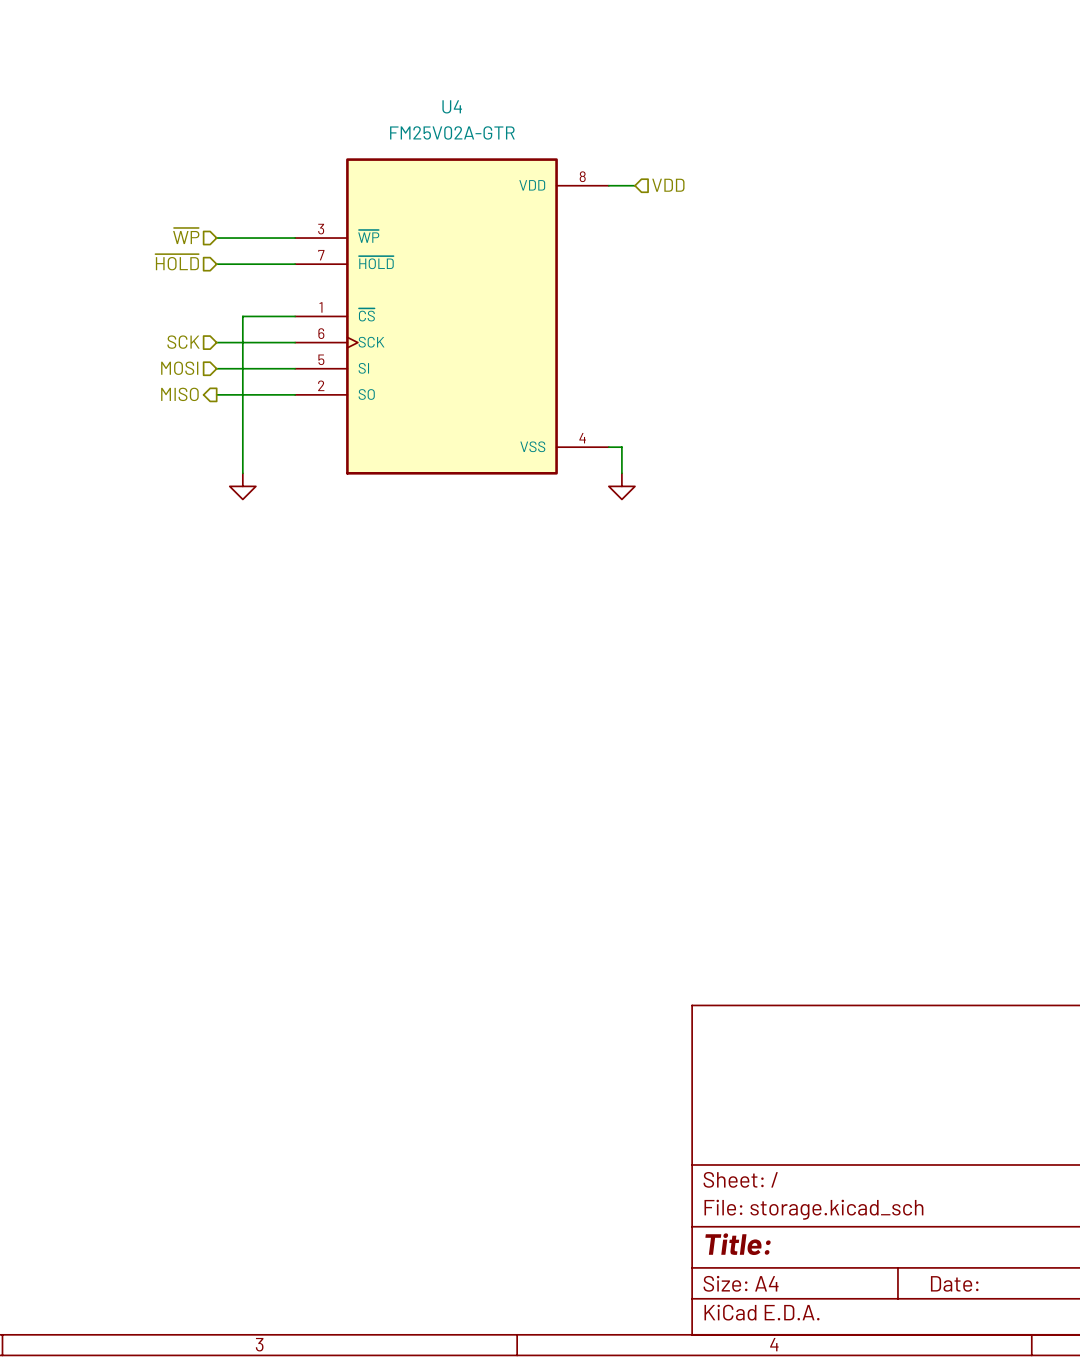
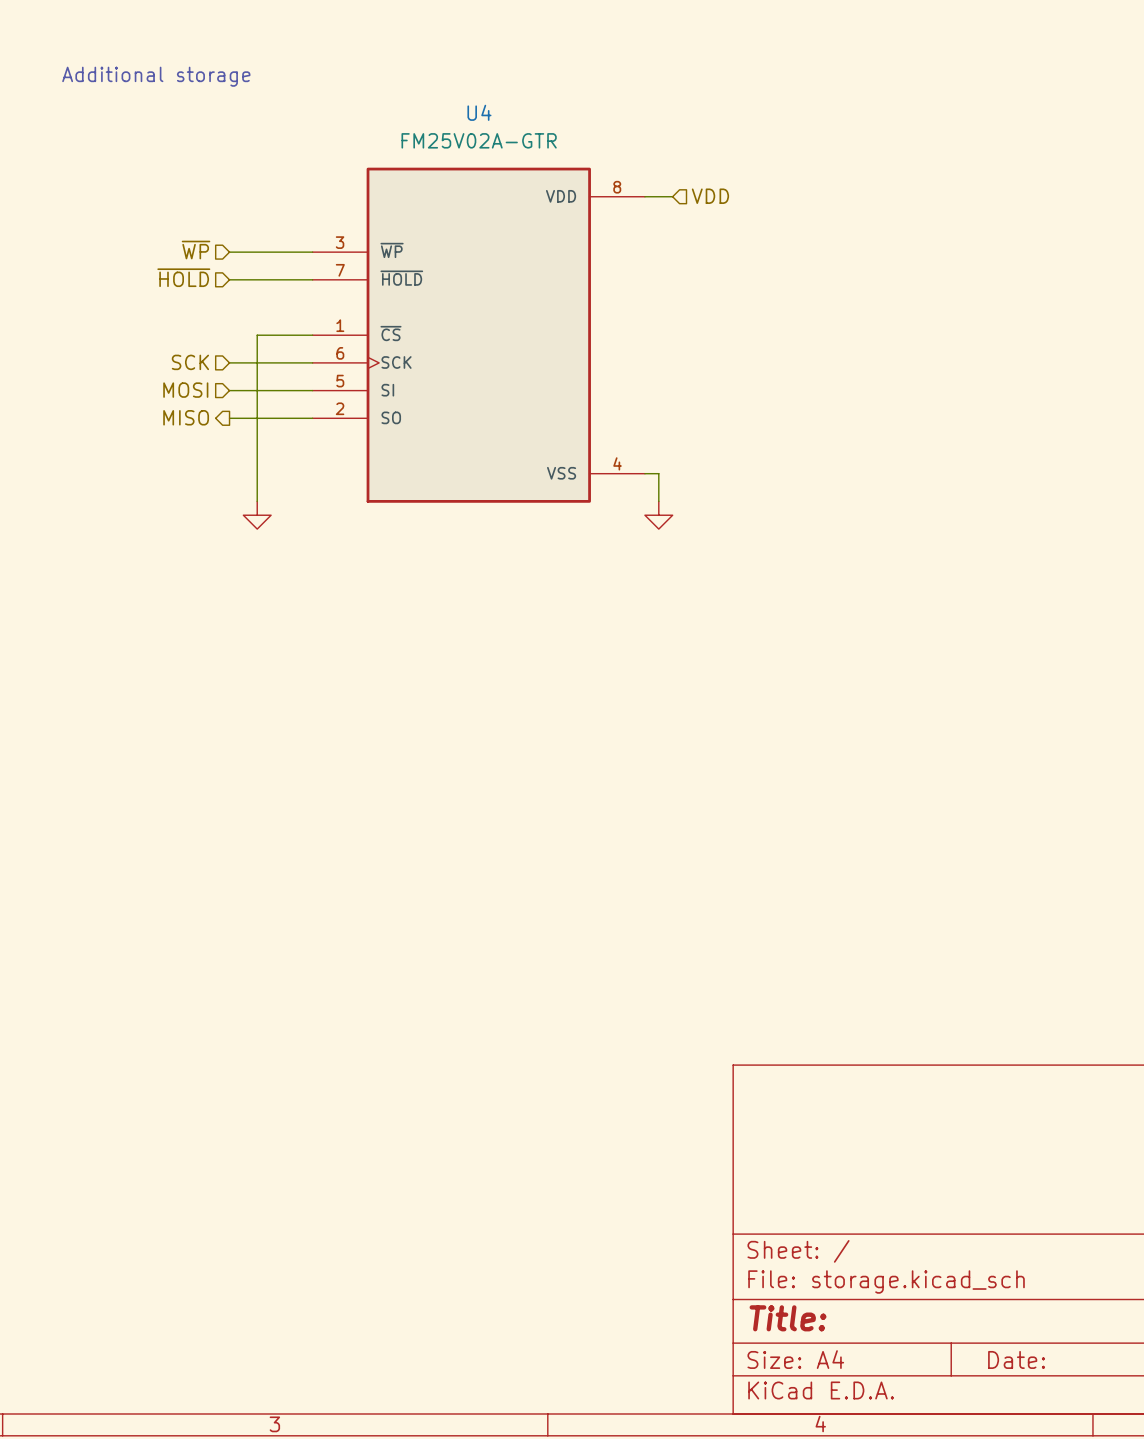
text: none -> Additional storage (156, 76)

